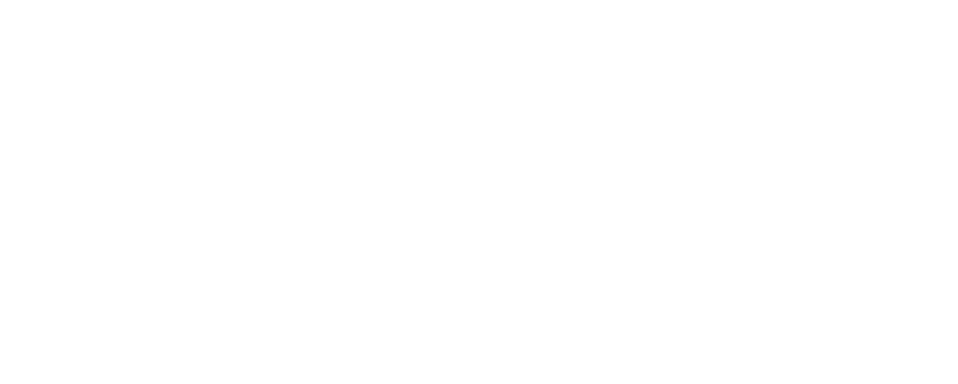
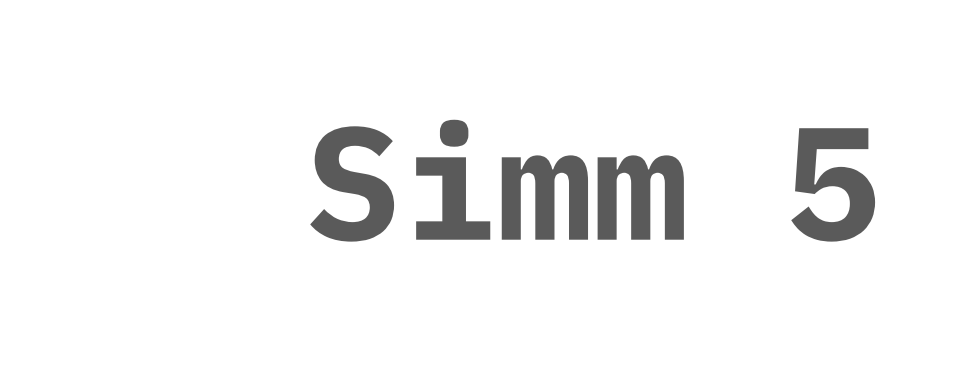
text: none -> Simm 5 (592, 180)

